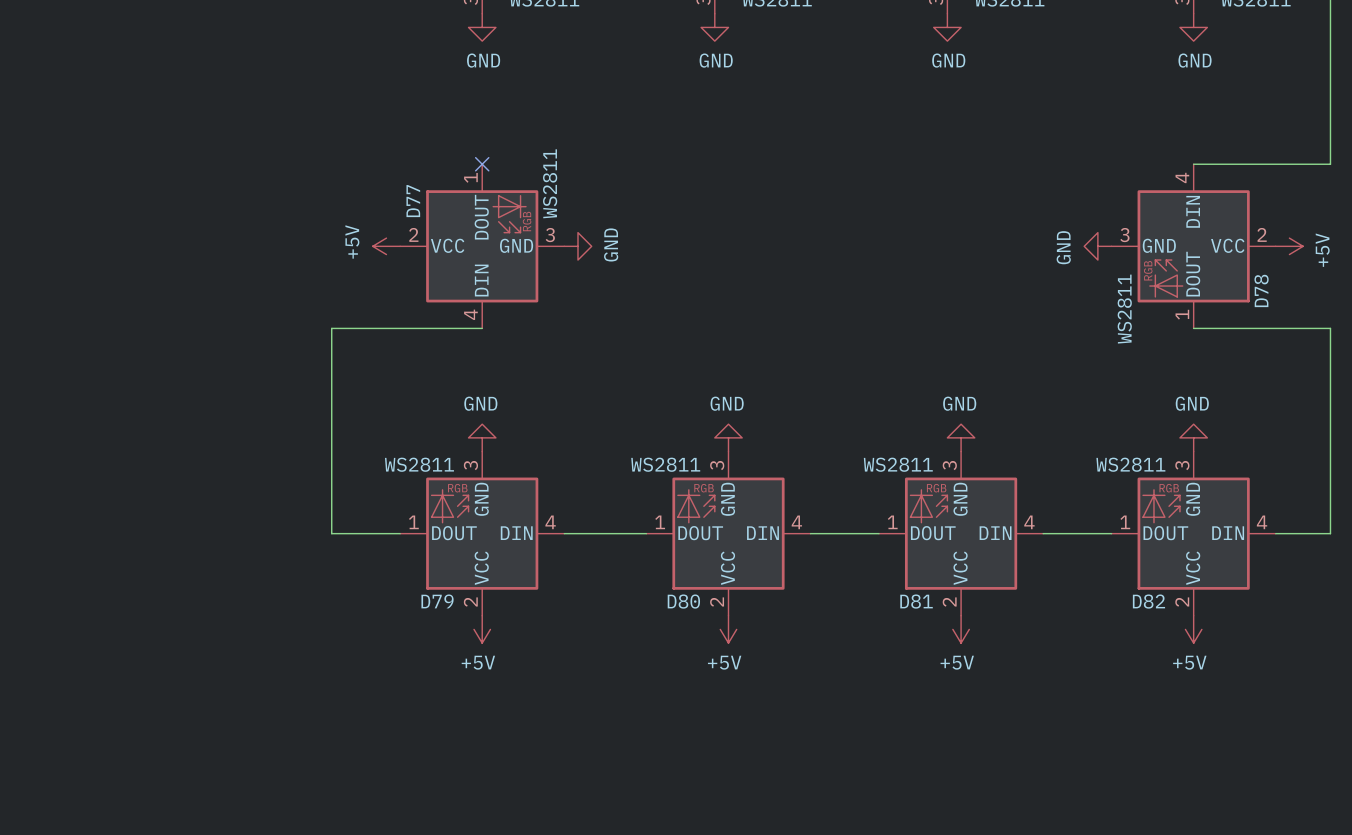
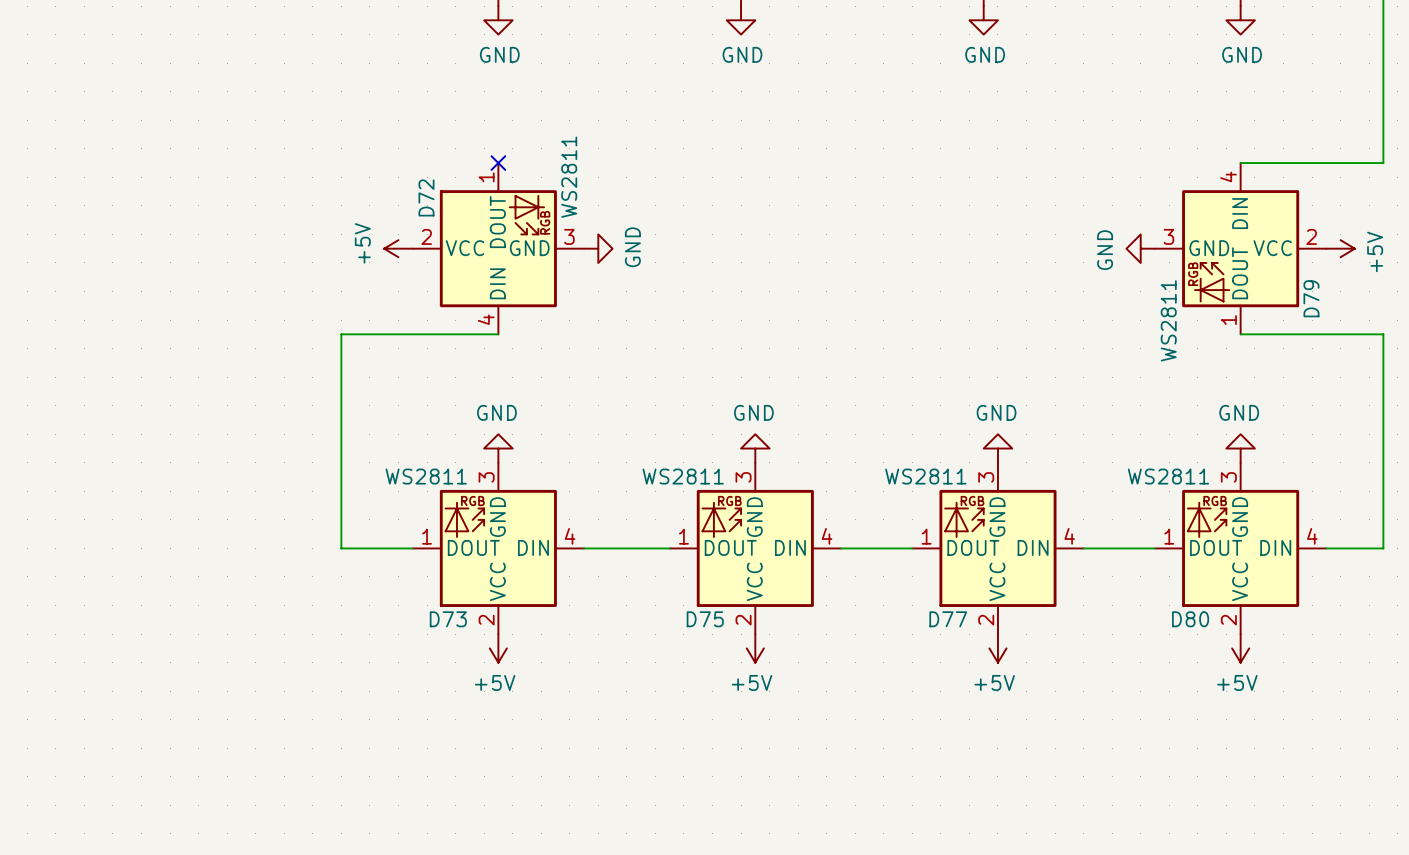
D77 name: D77 (413, 201) -> D72 (426, 197)
D78 name: D78 (1261, 290) -> D79 (1311, 298)
D79 name: D79 (437, 601) -> D73 (448, 619)
D80 name: D80 (683, 601) -> D75 (705, 619)
D81 name: D81 (916, 601) -> D77 (948, 619)
D82 name: D82 (1148, 601) -> D80 (1190, 619)

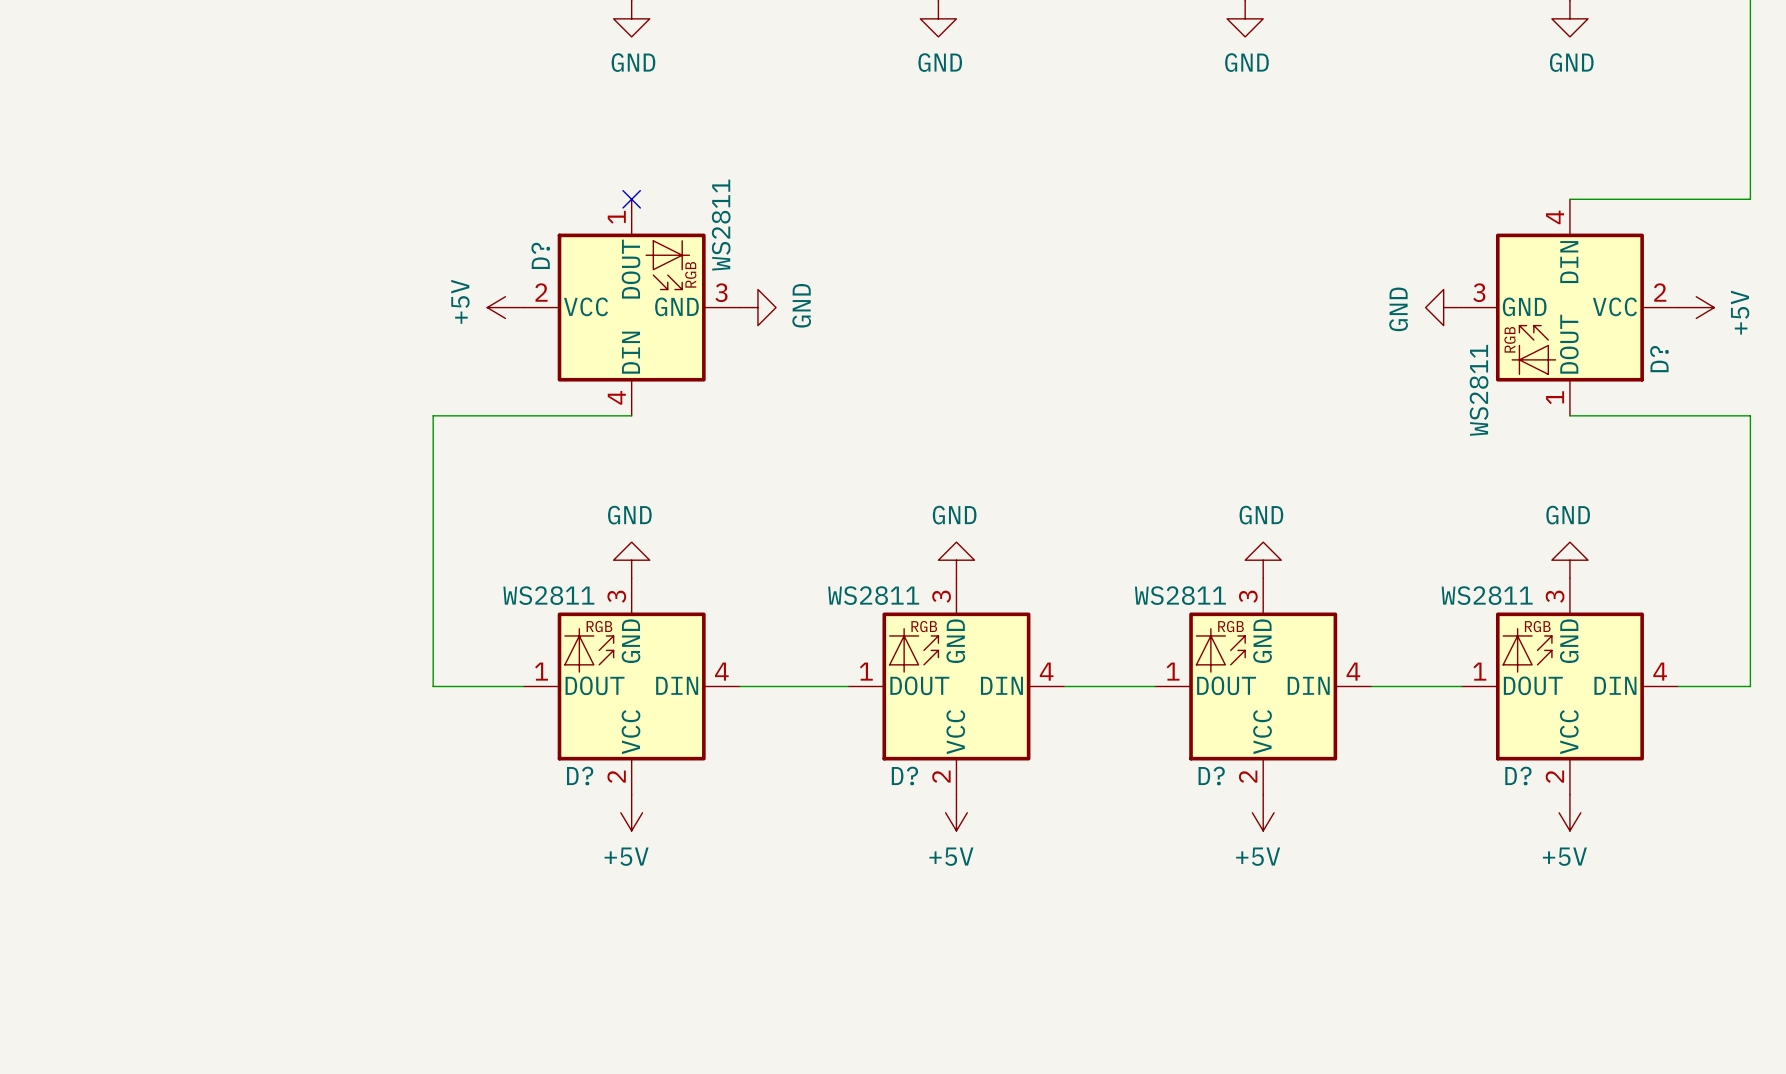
D72 name: D72 (426, 197) -> D? (540, 255)
D79 name: D79 (1311, 298) -> D? (1659, 359)
D73 name: D73 (448, 619) -> D? (580, 776)
D75 name: D75 (705, 619) -> D? (904, 776)
D77 name: D77 (948, 619) -> D? (1211, 776)
D80 name: D80 (1190, 619) -> D? (1518, 776)

